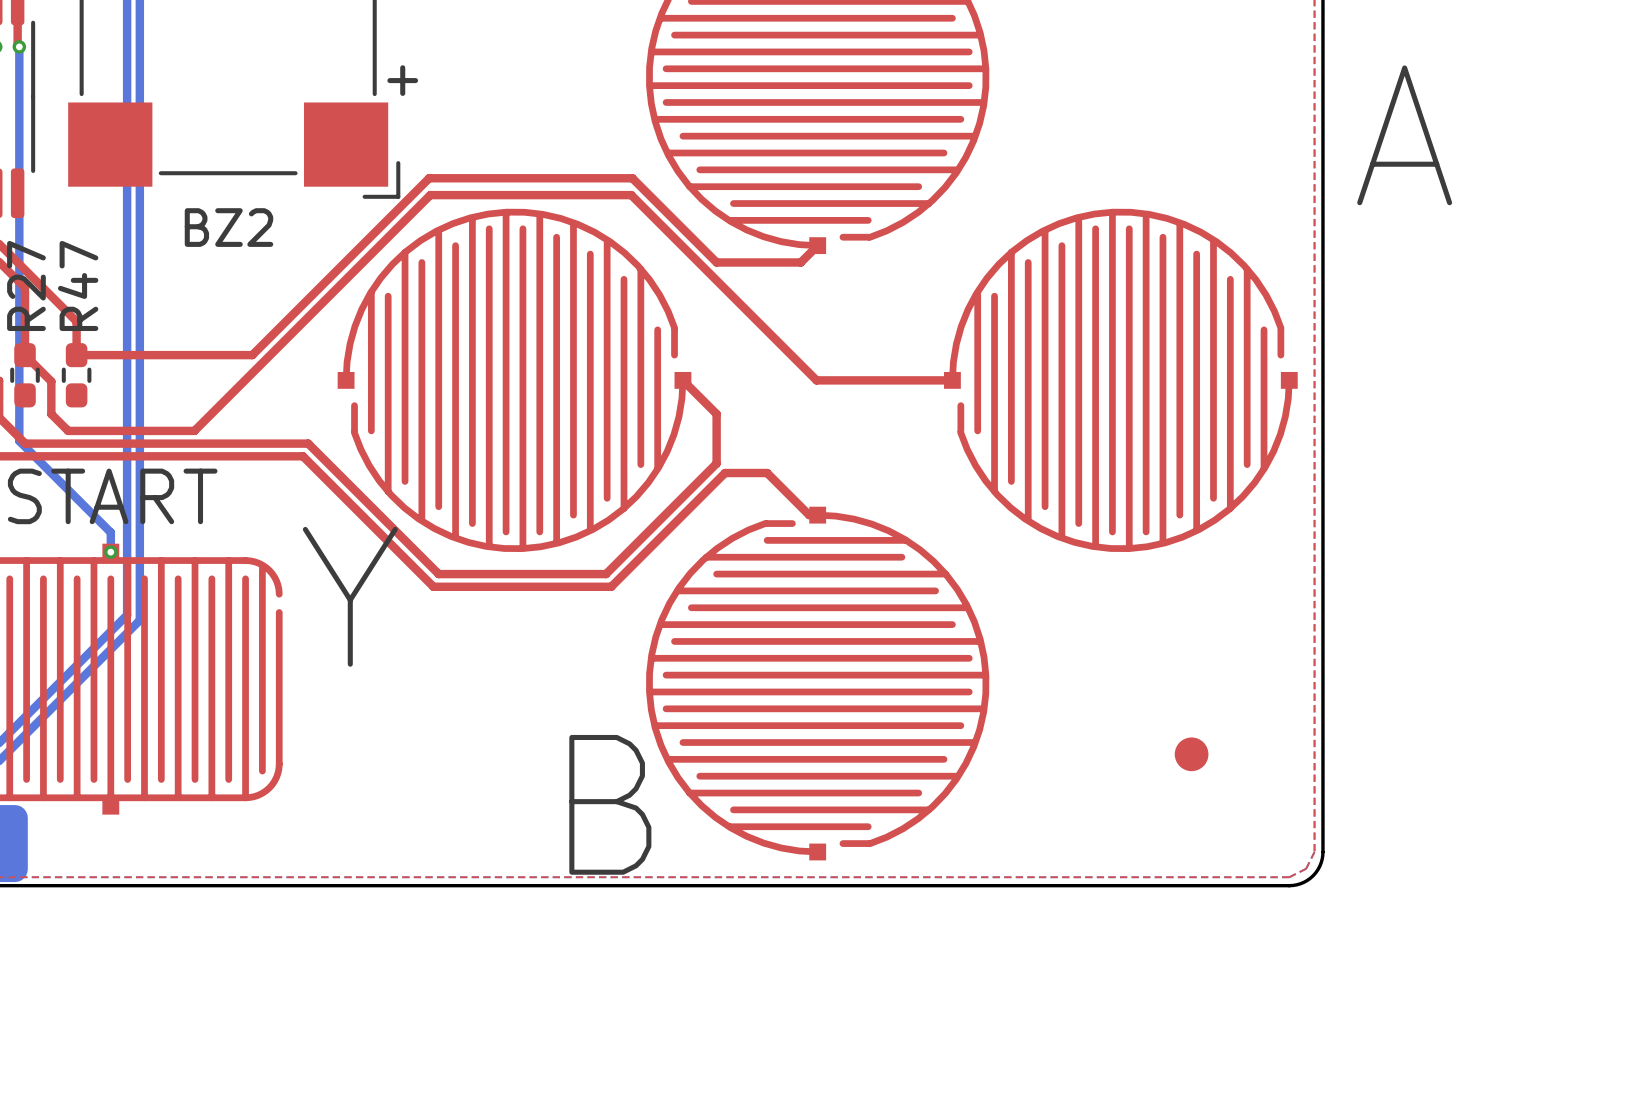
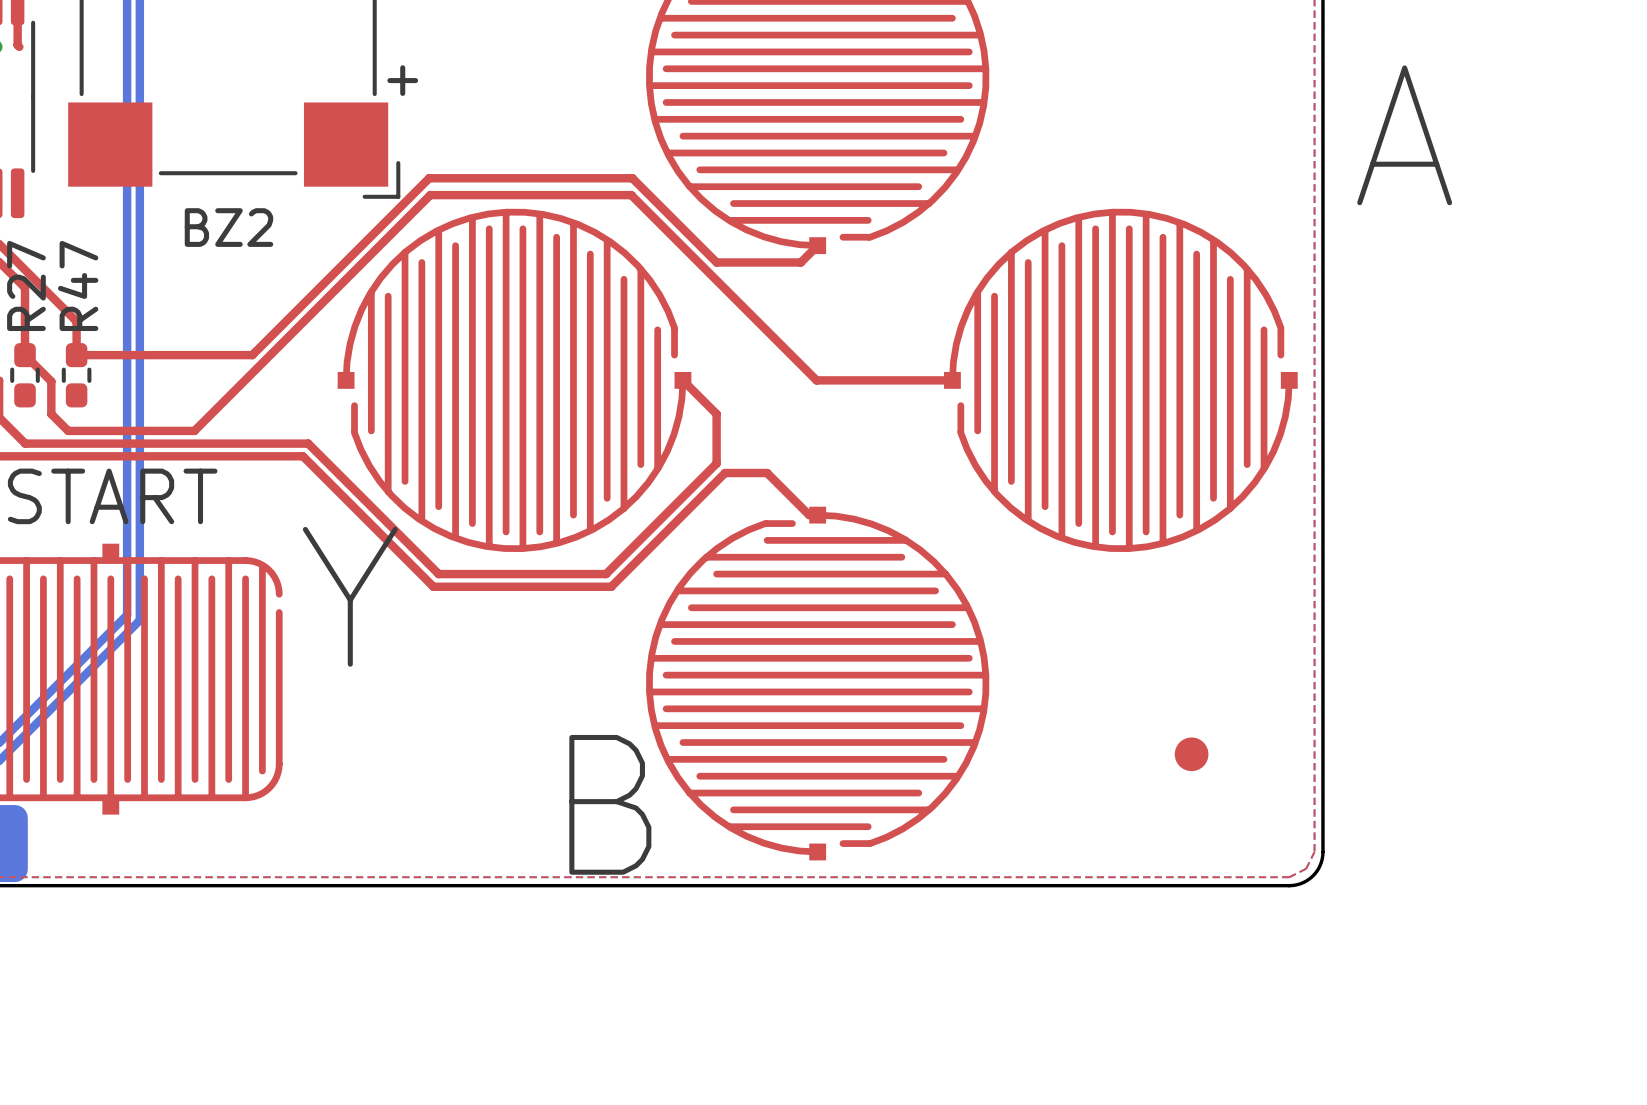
bottom track: (19, 46) (19, 441) (110, 532) (110, 552) -> none
via: (19, 46) -> none
via: (110, 552) -> none

